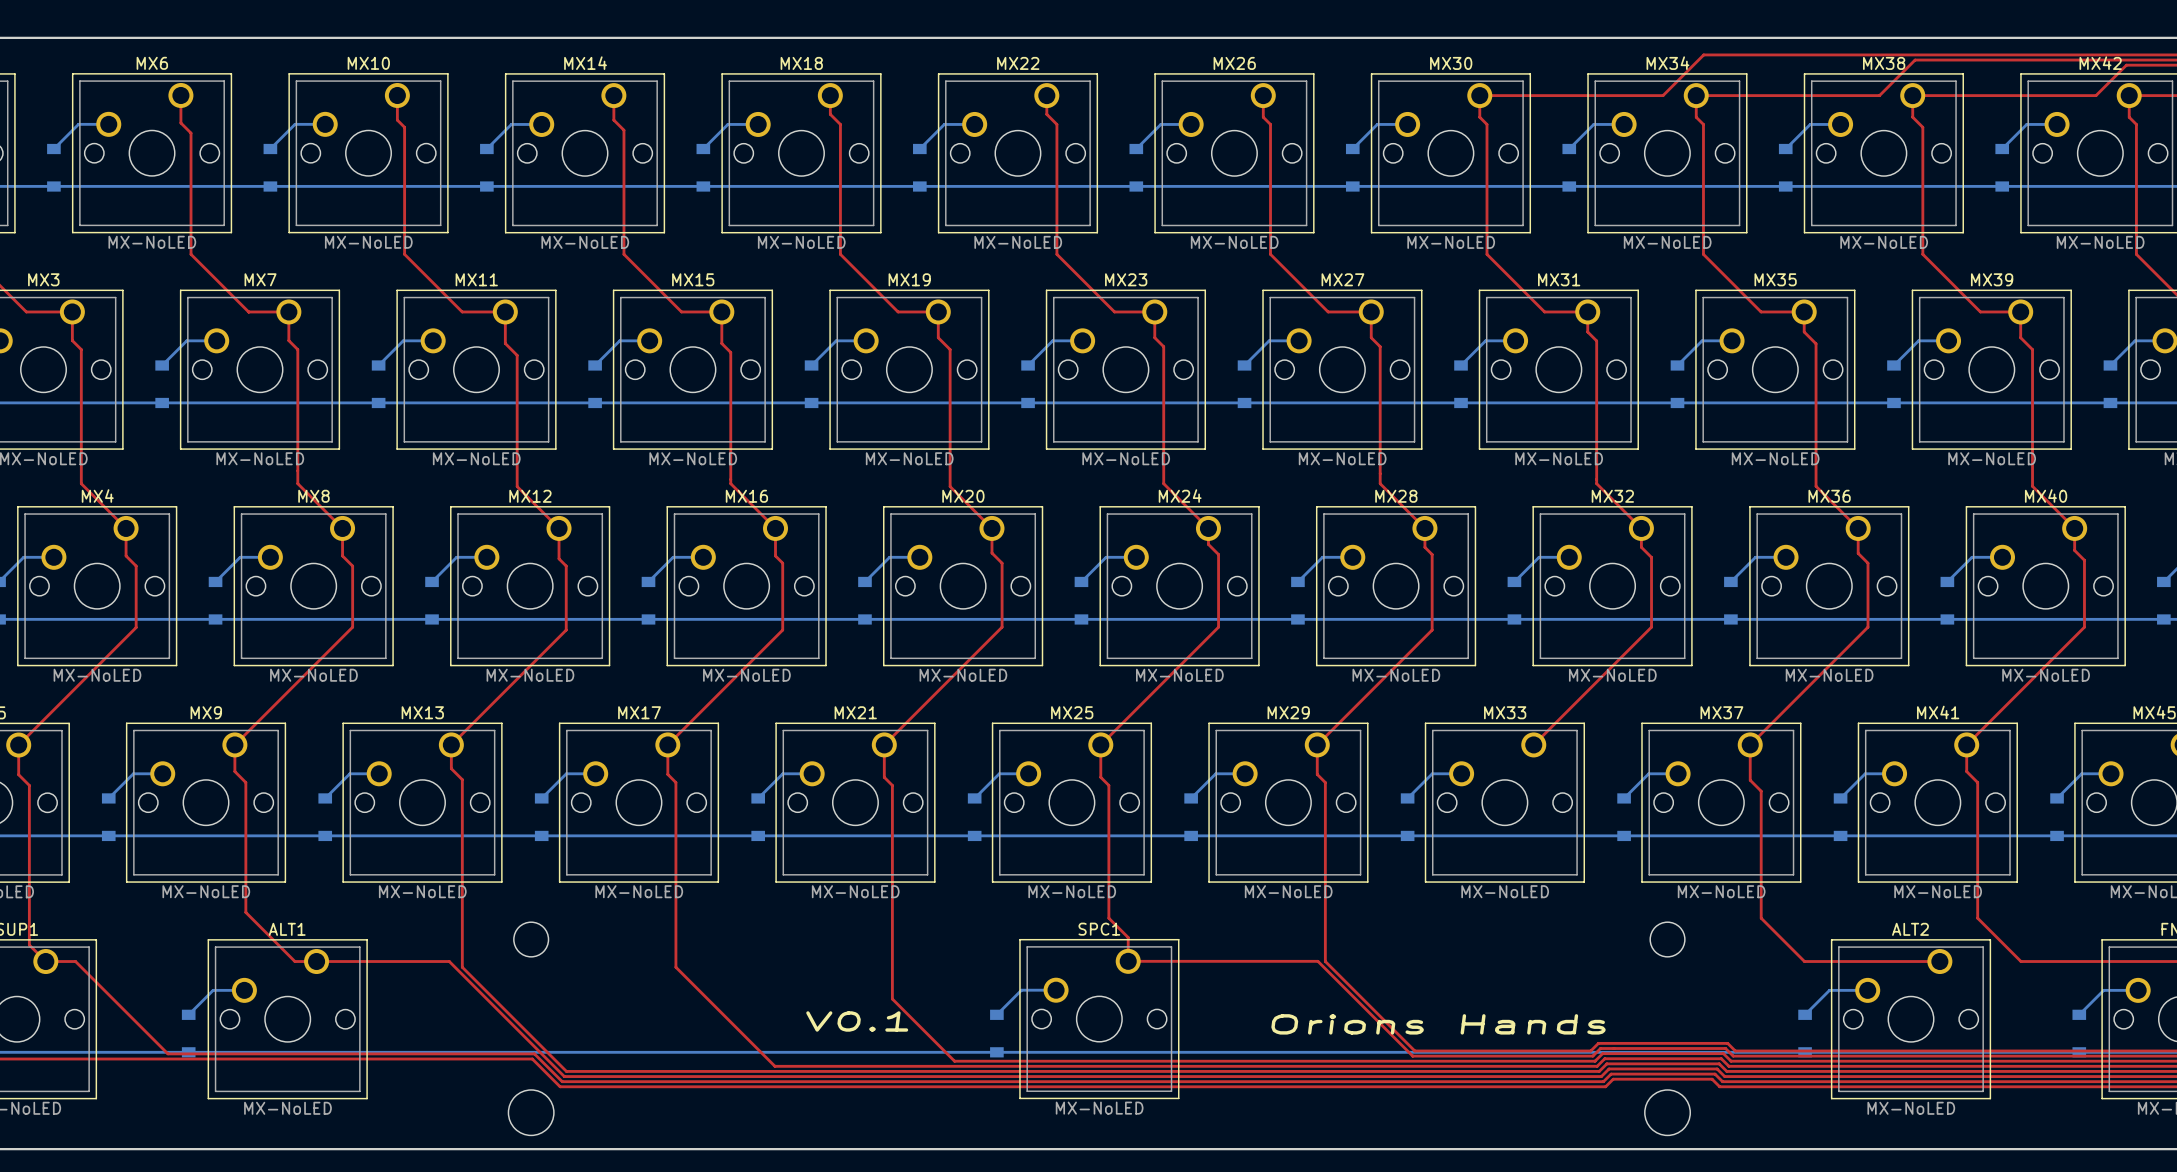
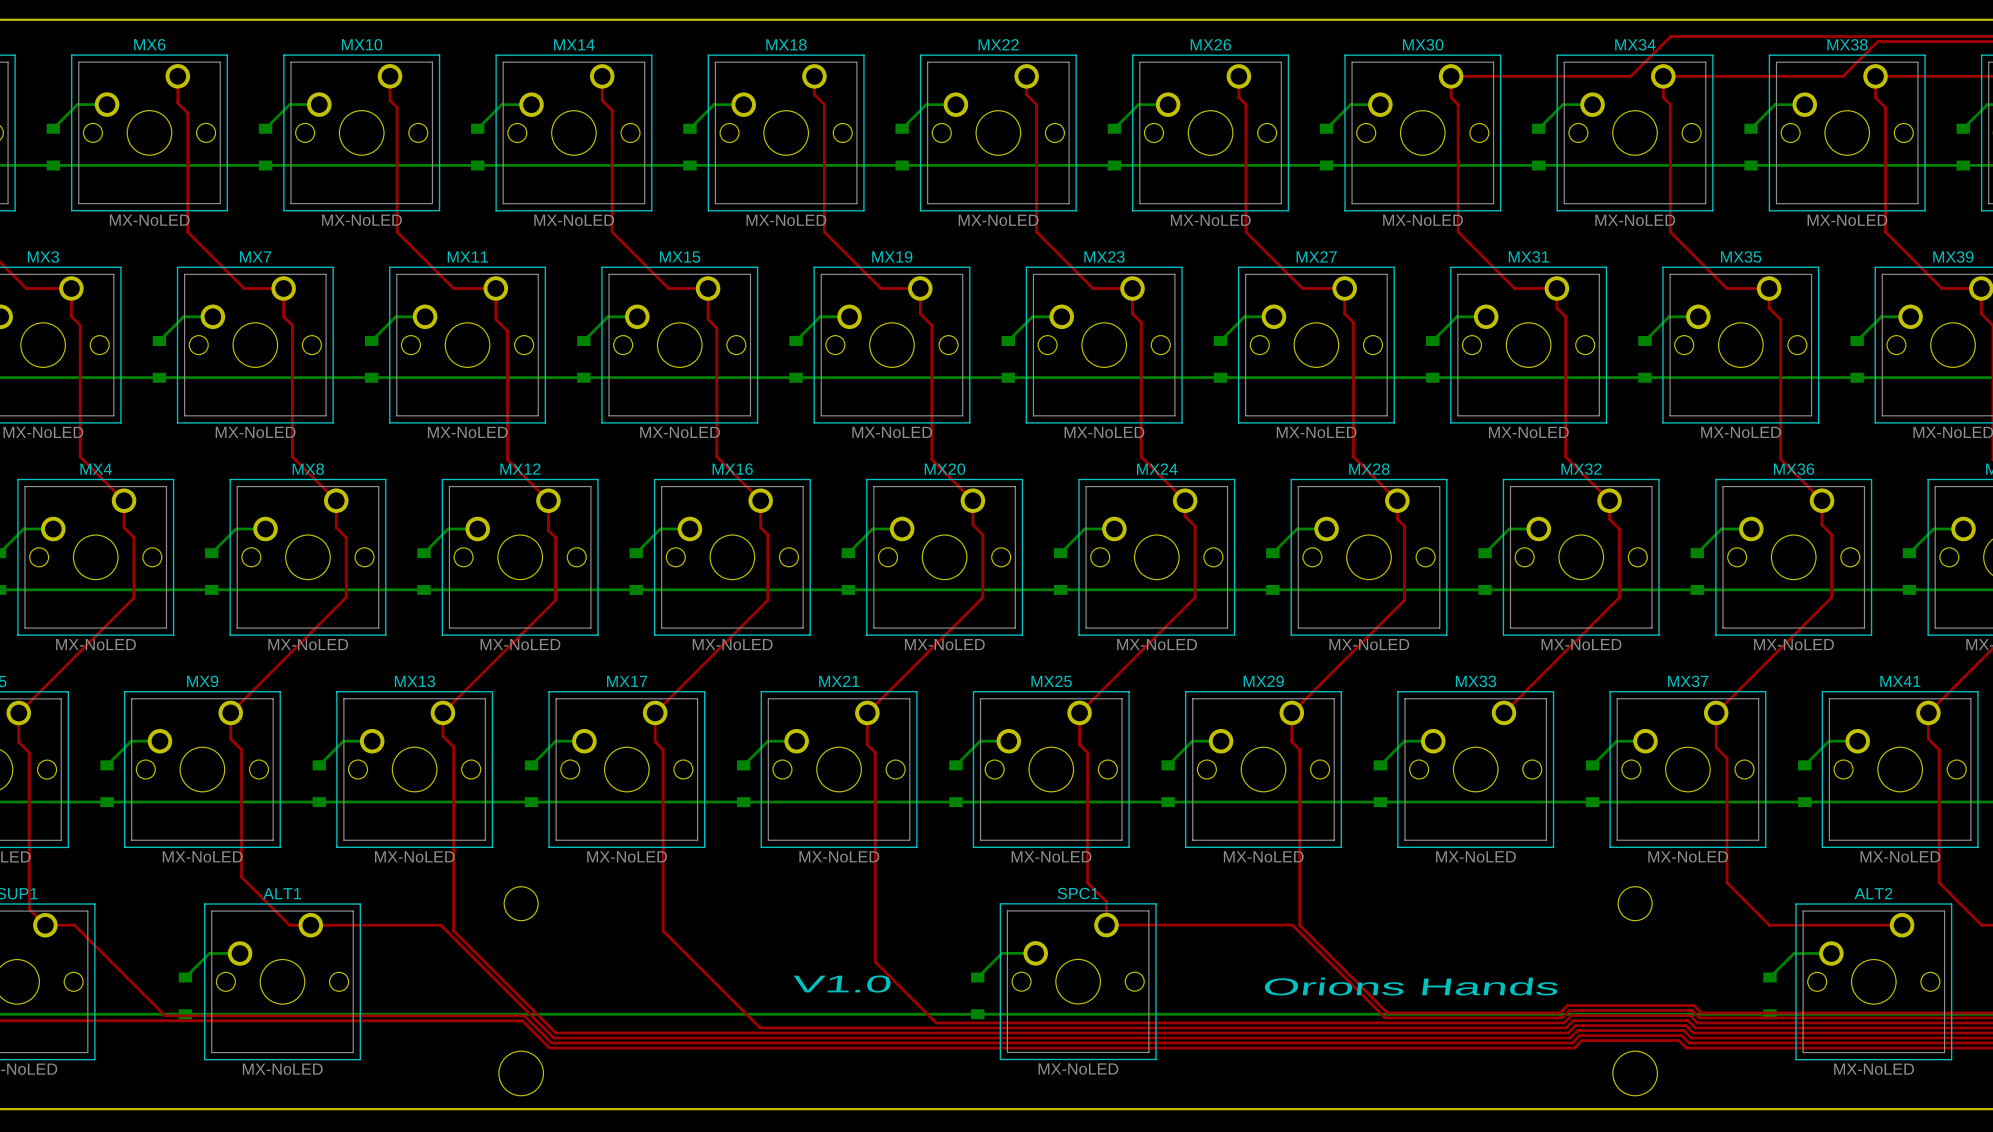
text: V0.1 (857, 1021) -> V1.0 (842, 984)

